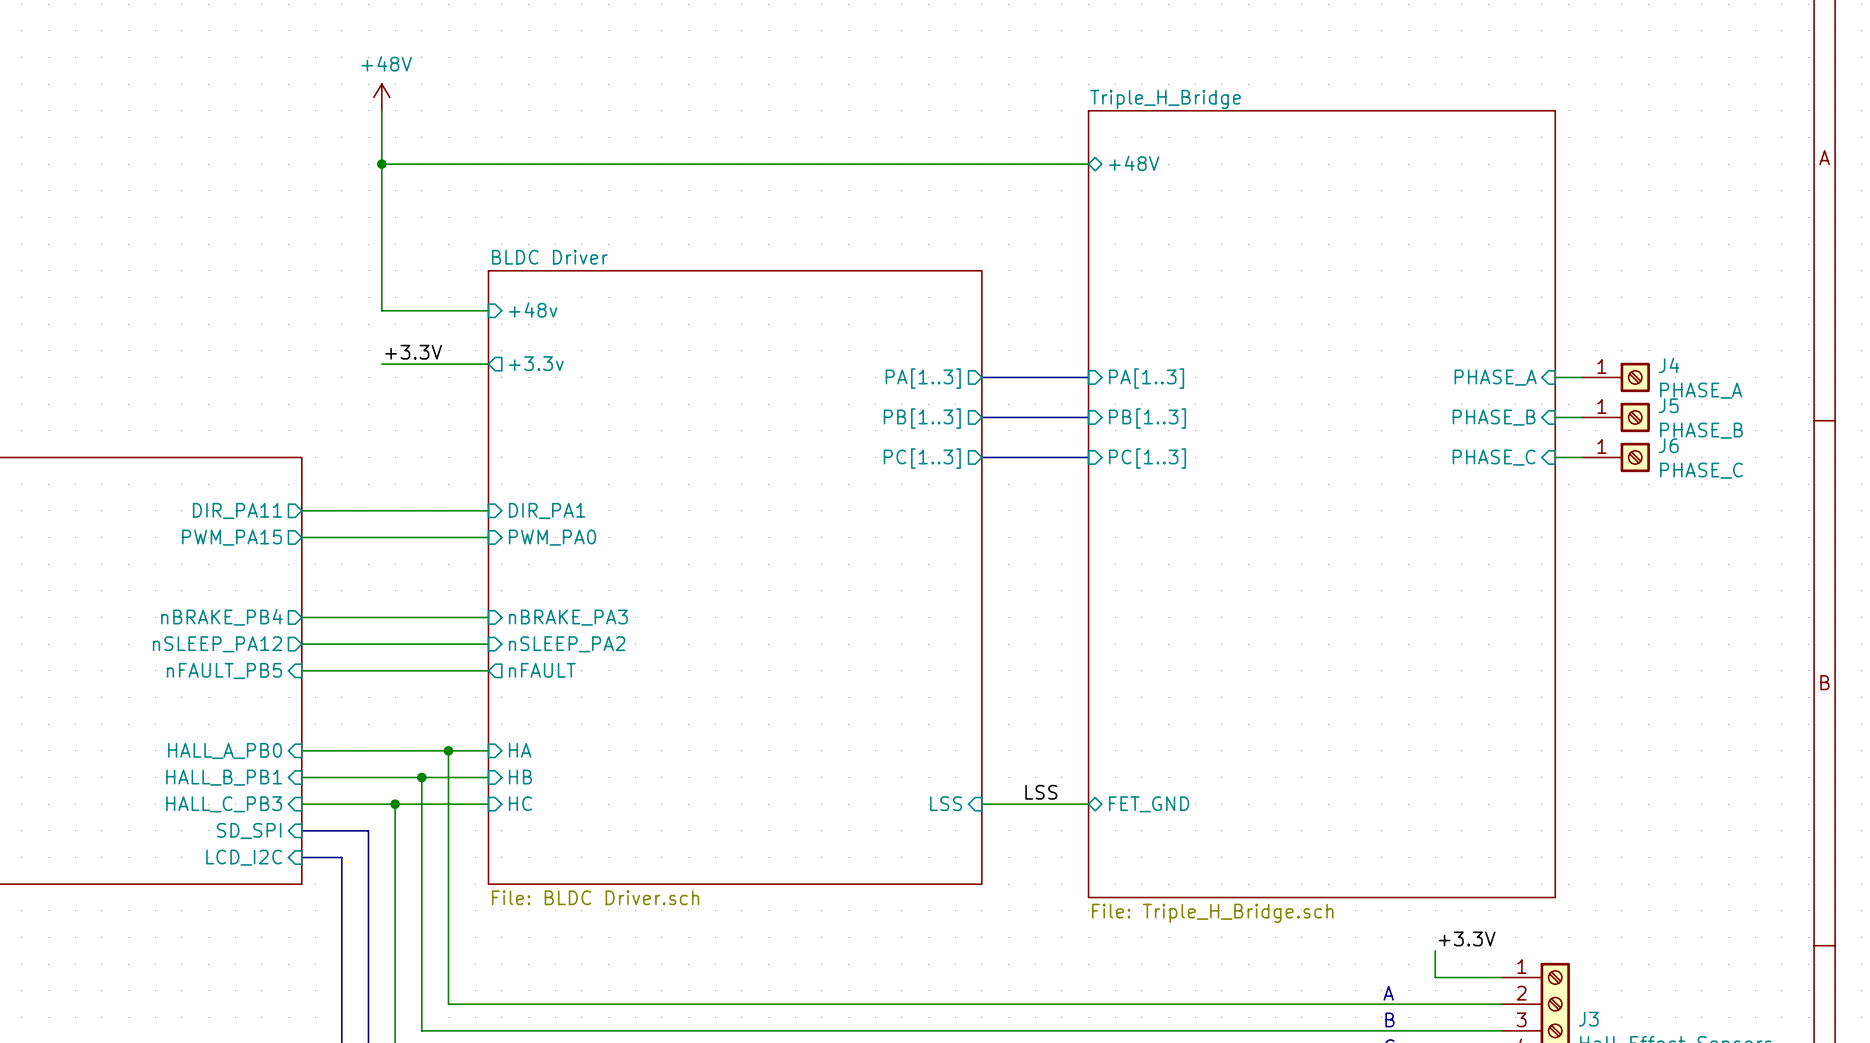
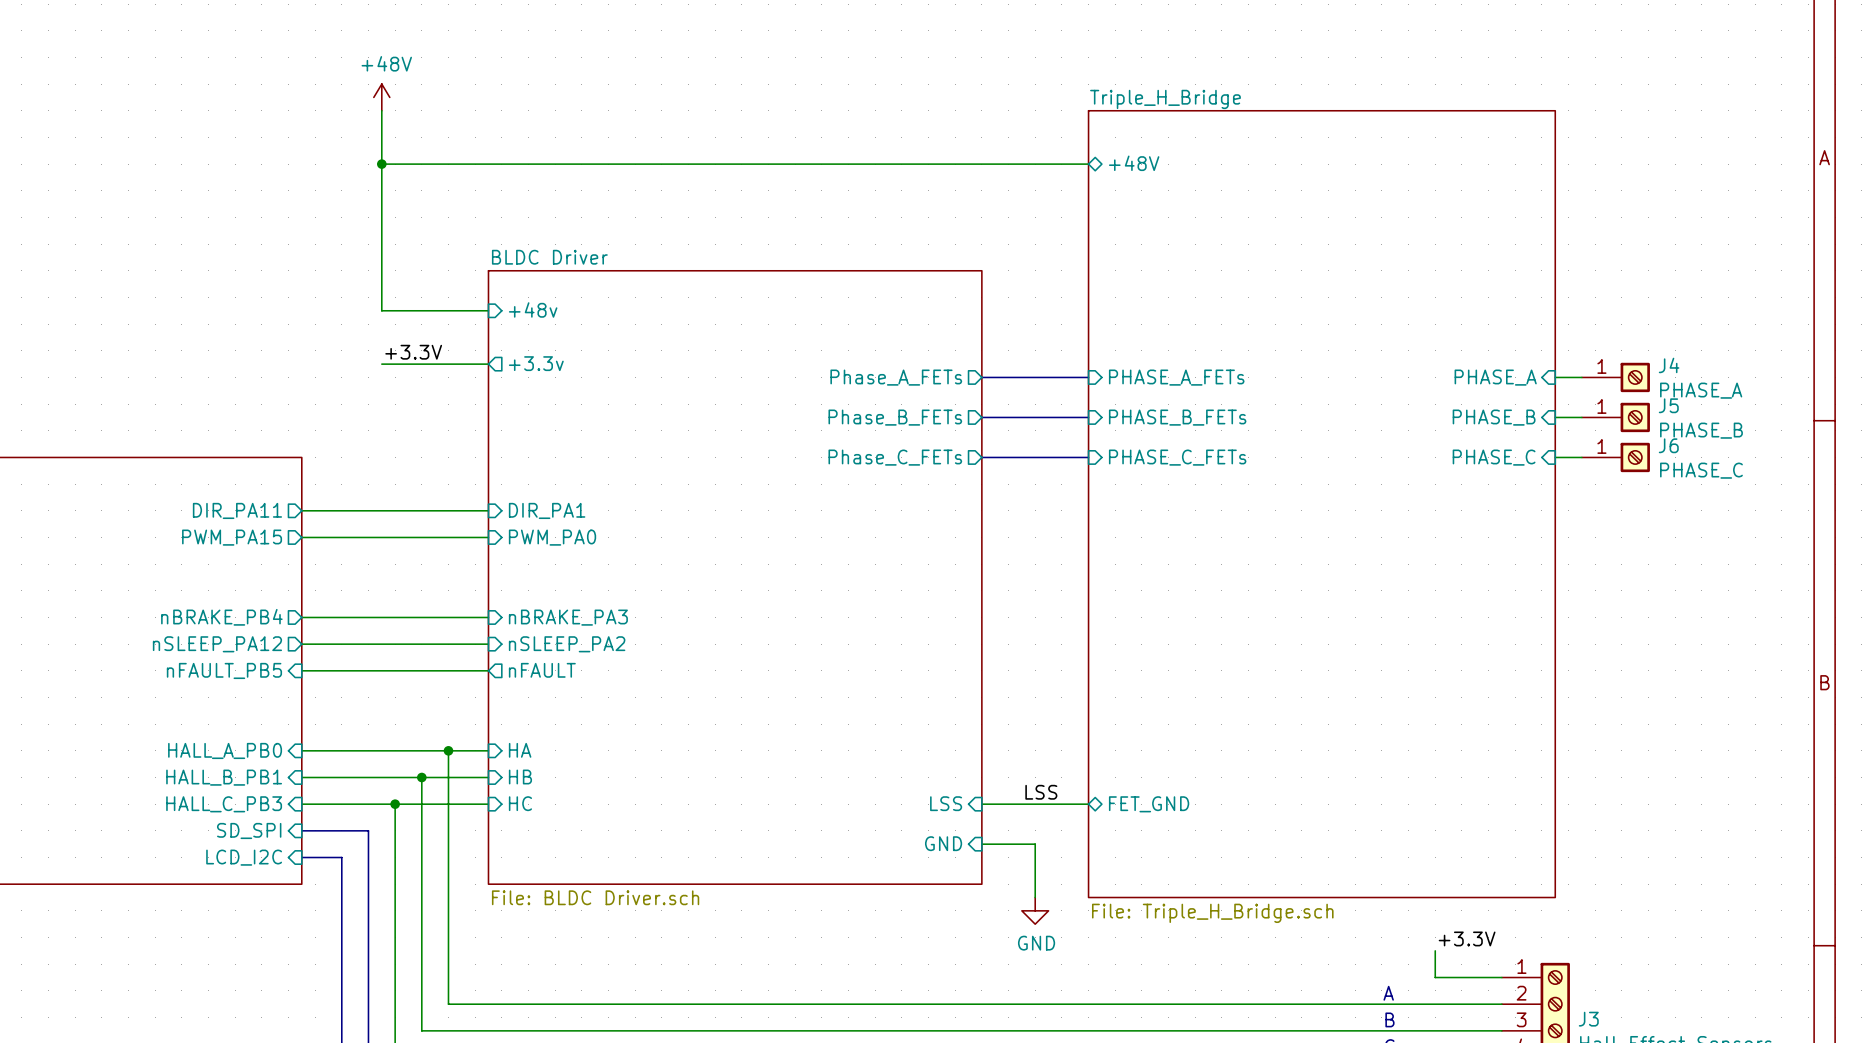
sheet pin: PA[1..3] (923, 378) -> Phase_A_FETs (896, 377)
sheet pin: PA[1..3] (1146, 378) -> PHASE_A_FETs (1176, 377)
sheet pin: PB[1..3] (922, 418) -> Phase_B_FETs (895, 417)
sheet pin: PB[1..3] (1147, 418) -> PHASE_B_FETs (1177, 417)
sheet pin: PC[1..3] (922, 458) -> Phase_C_FETs (895, 457)
sheet pin: PC[1..3] (1147, 458) -> PHASE_C_FETs (1177, 457)
sheet pin: none -> GND (943, 843)
wire: none -> (981, 844) (1035, 844) (1035, 897)
power symbol: none -> GND (1035, 910)

